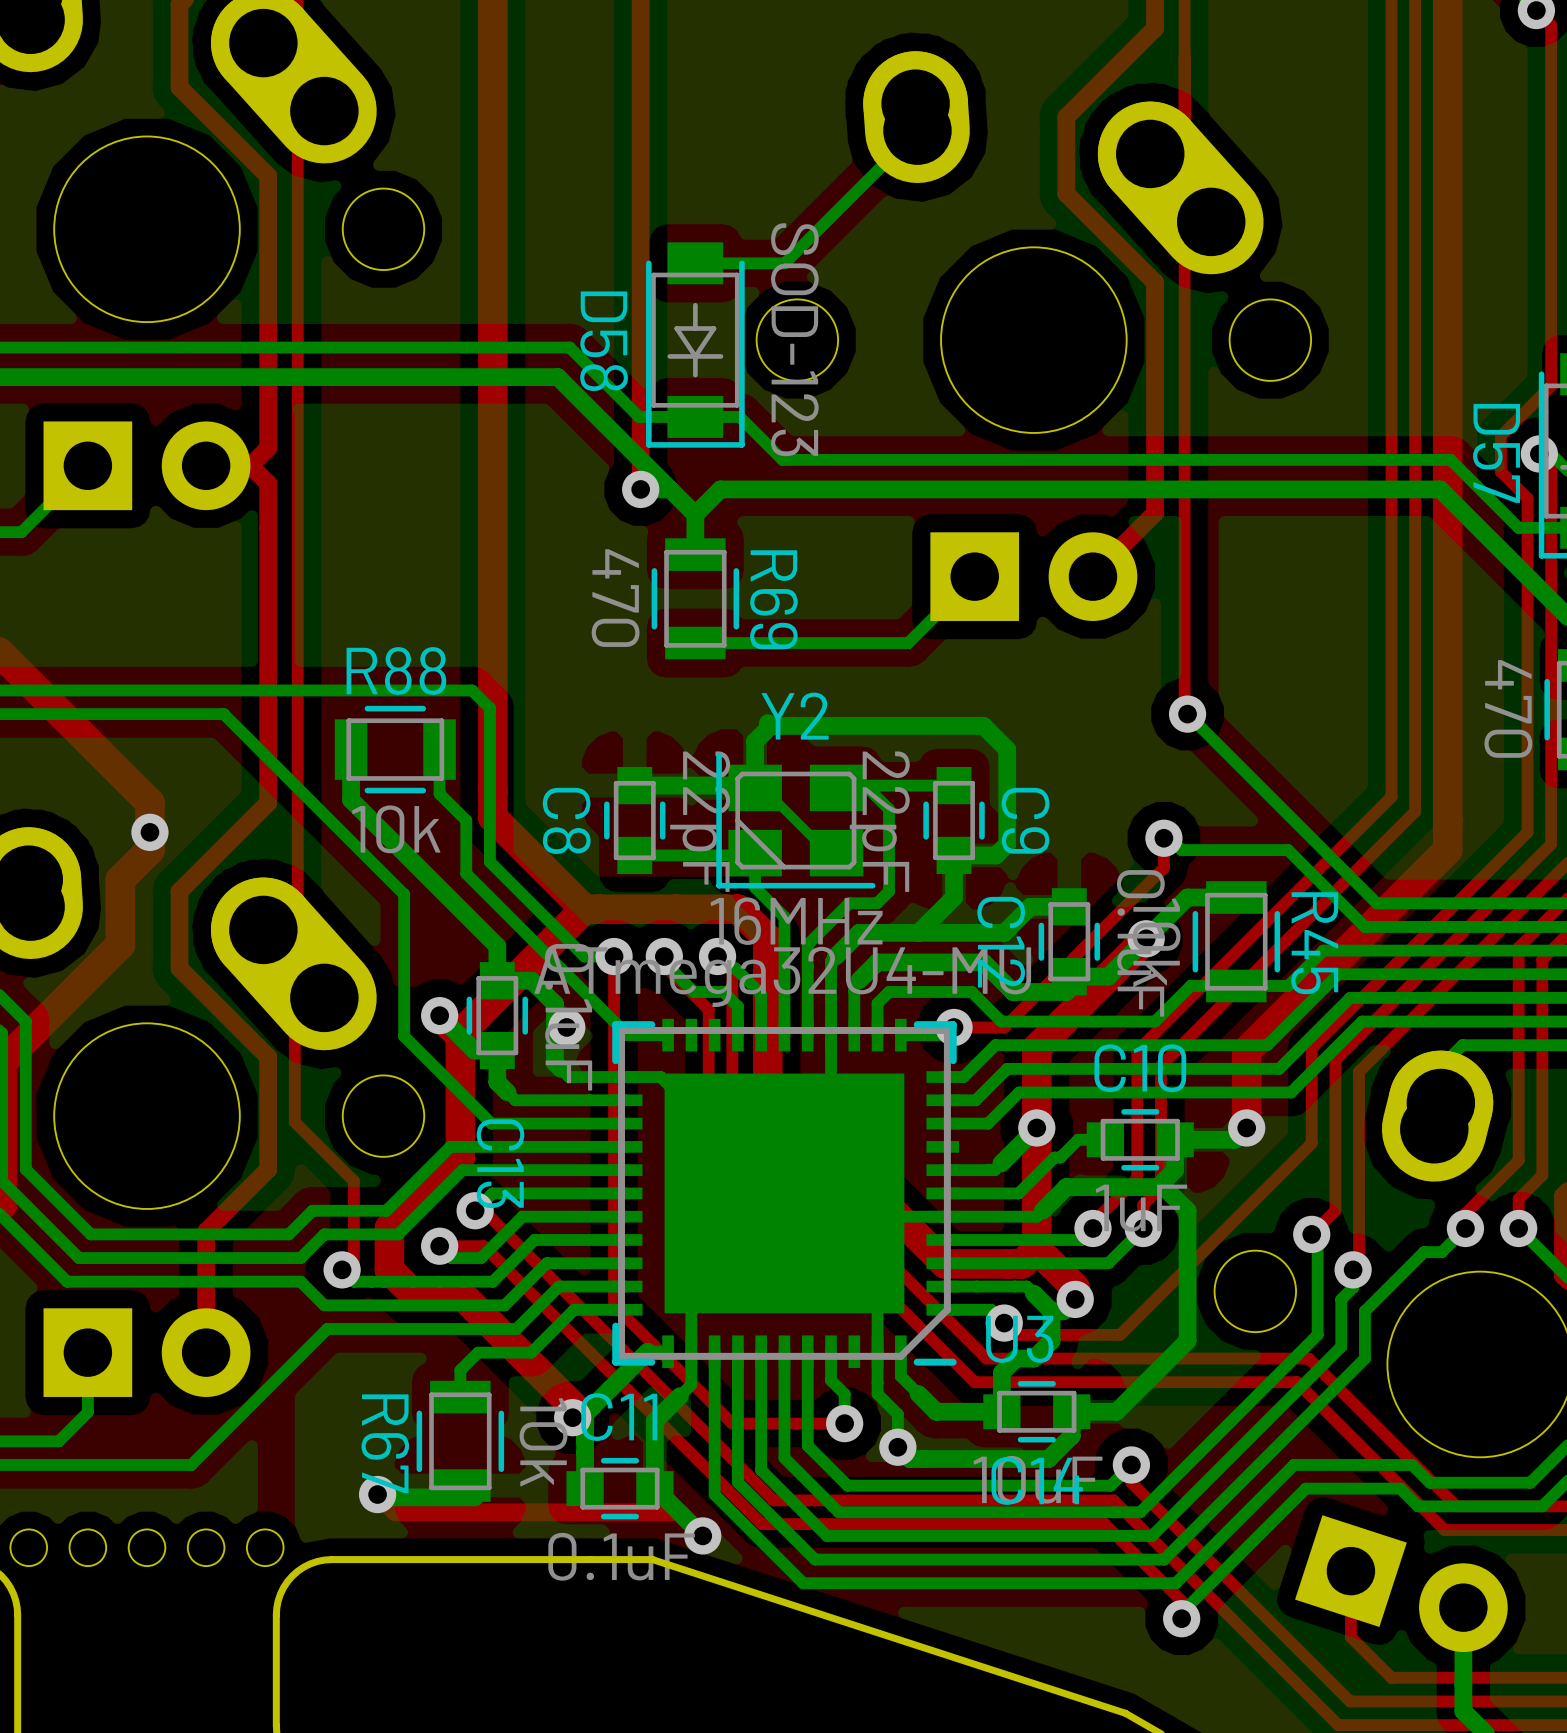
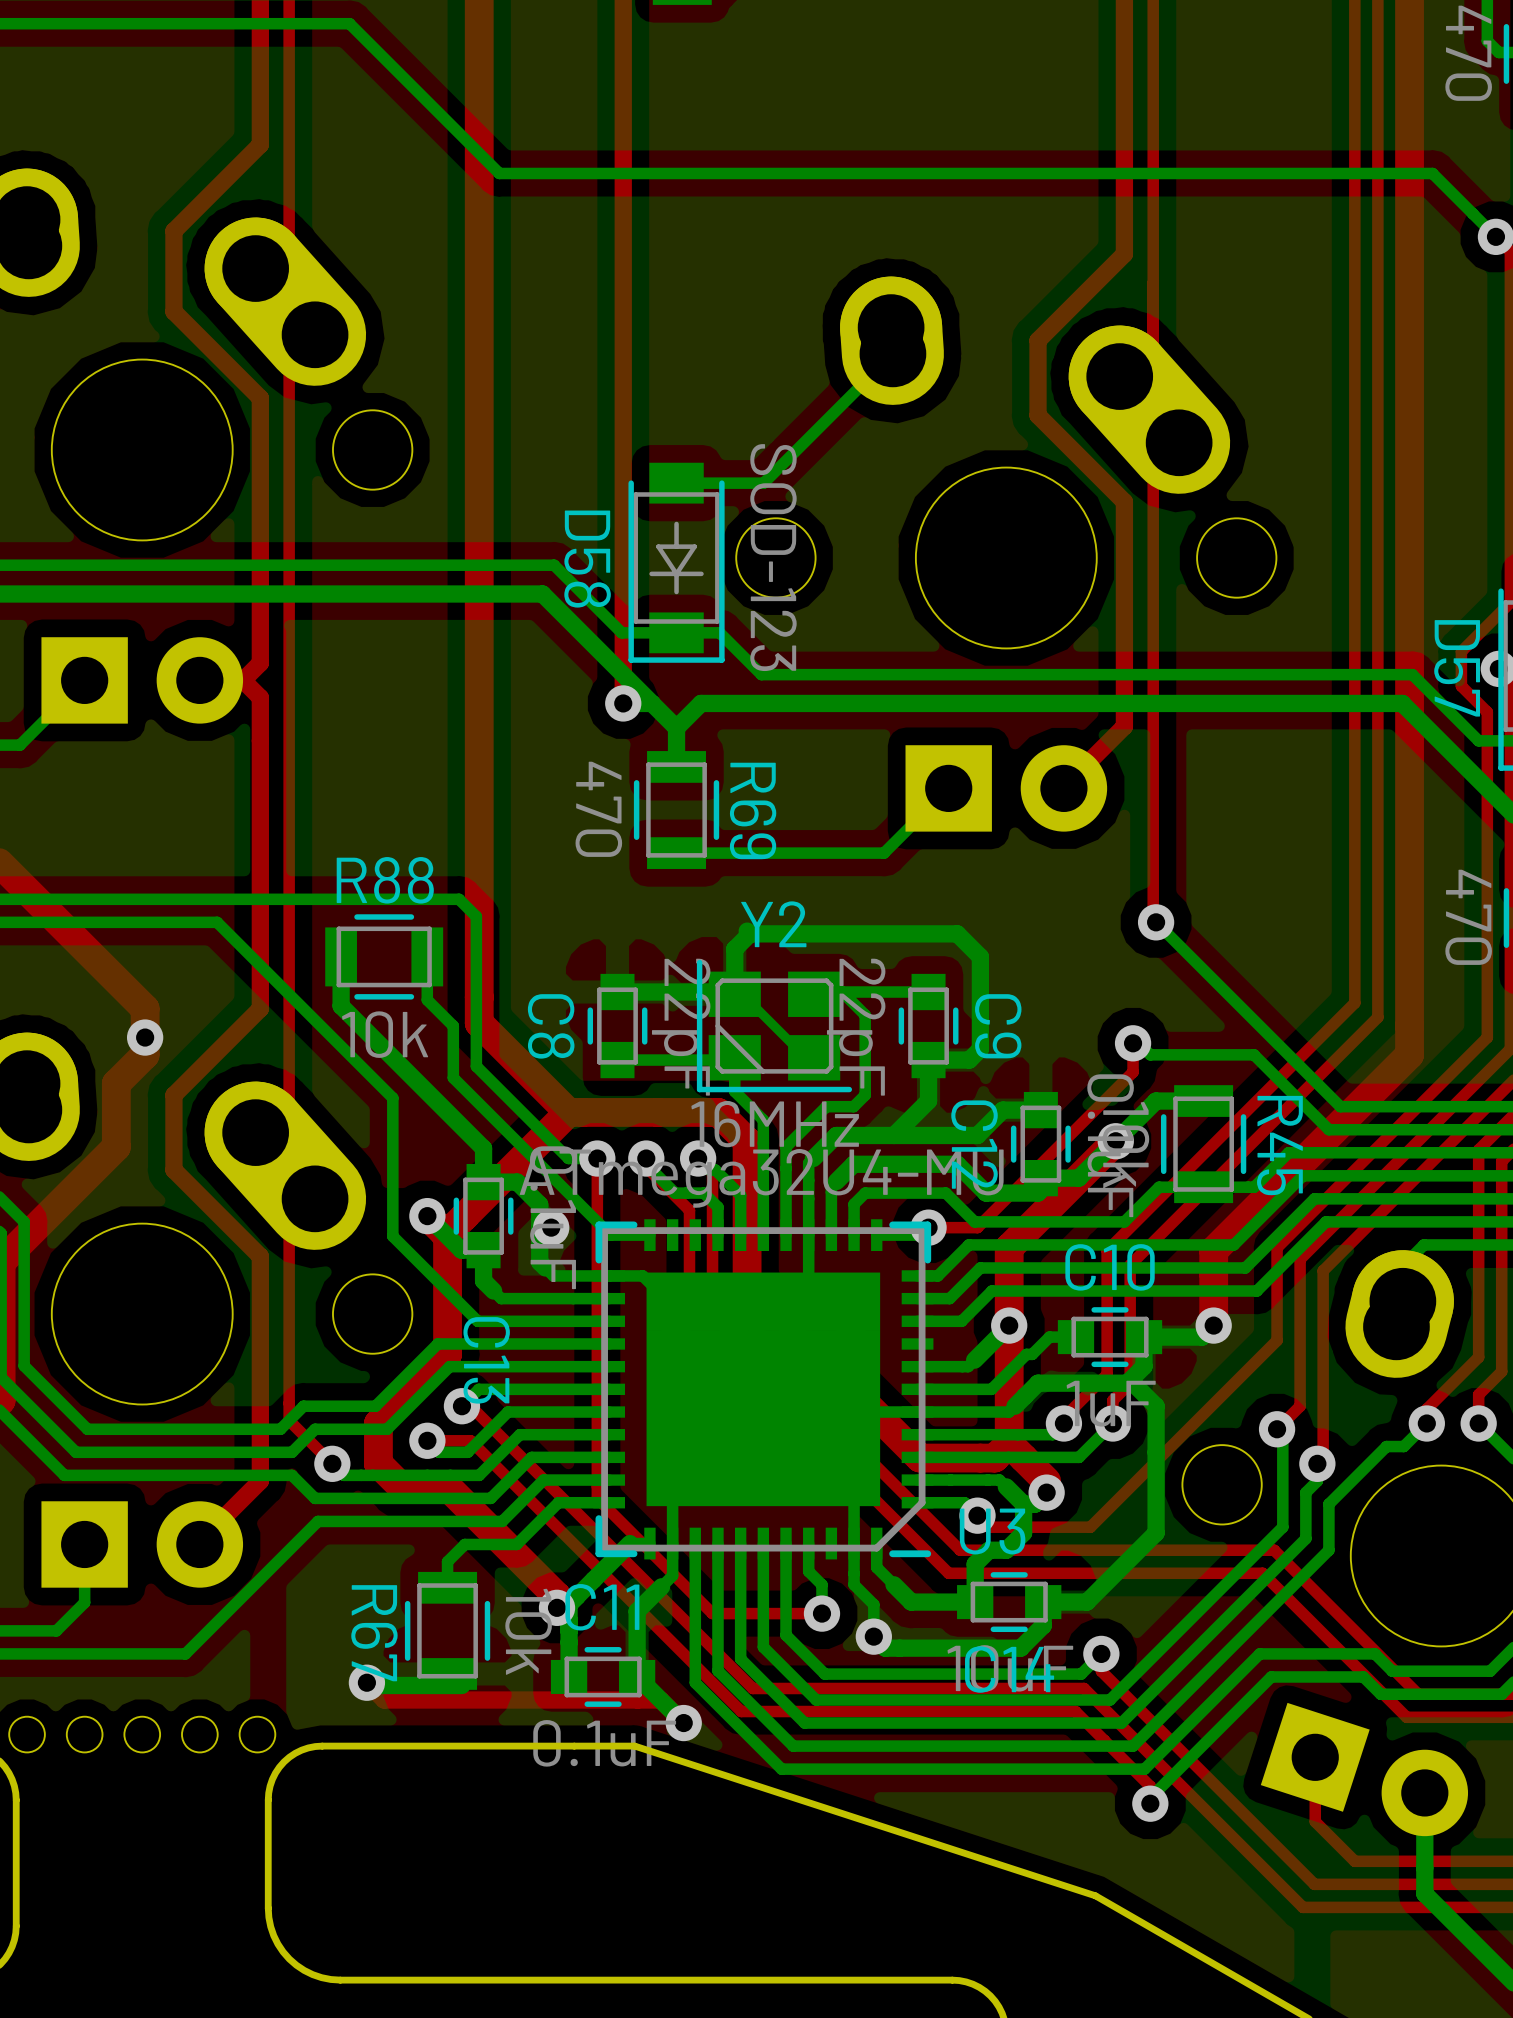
top track: (297, 1024) (294, 1027) (294, 1122) (353, 1181) (353, 1263) (348, 1269) (342, 1269) -> (289, 1224) (289, 1420) (332, 1463)
top track: (268, 1169) (206, 1231) (206, 1349) -> (260, 1365) (260, 1481) (199, 1541)

